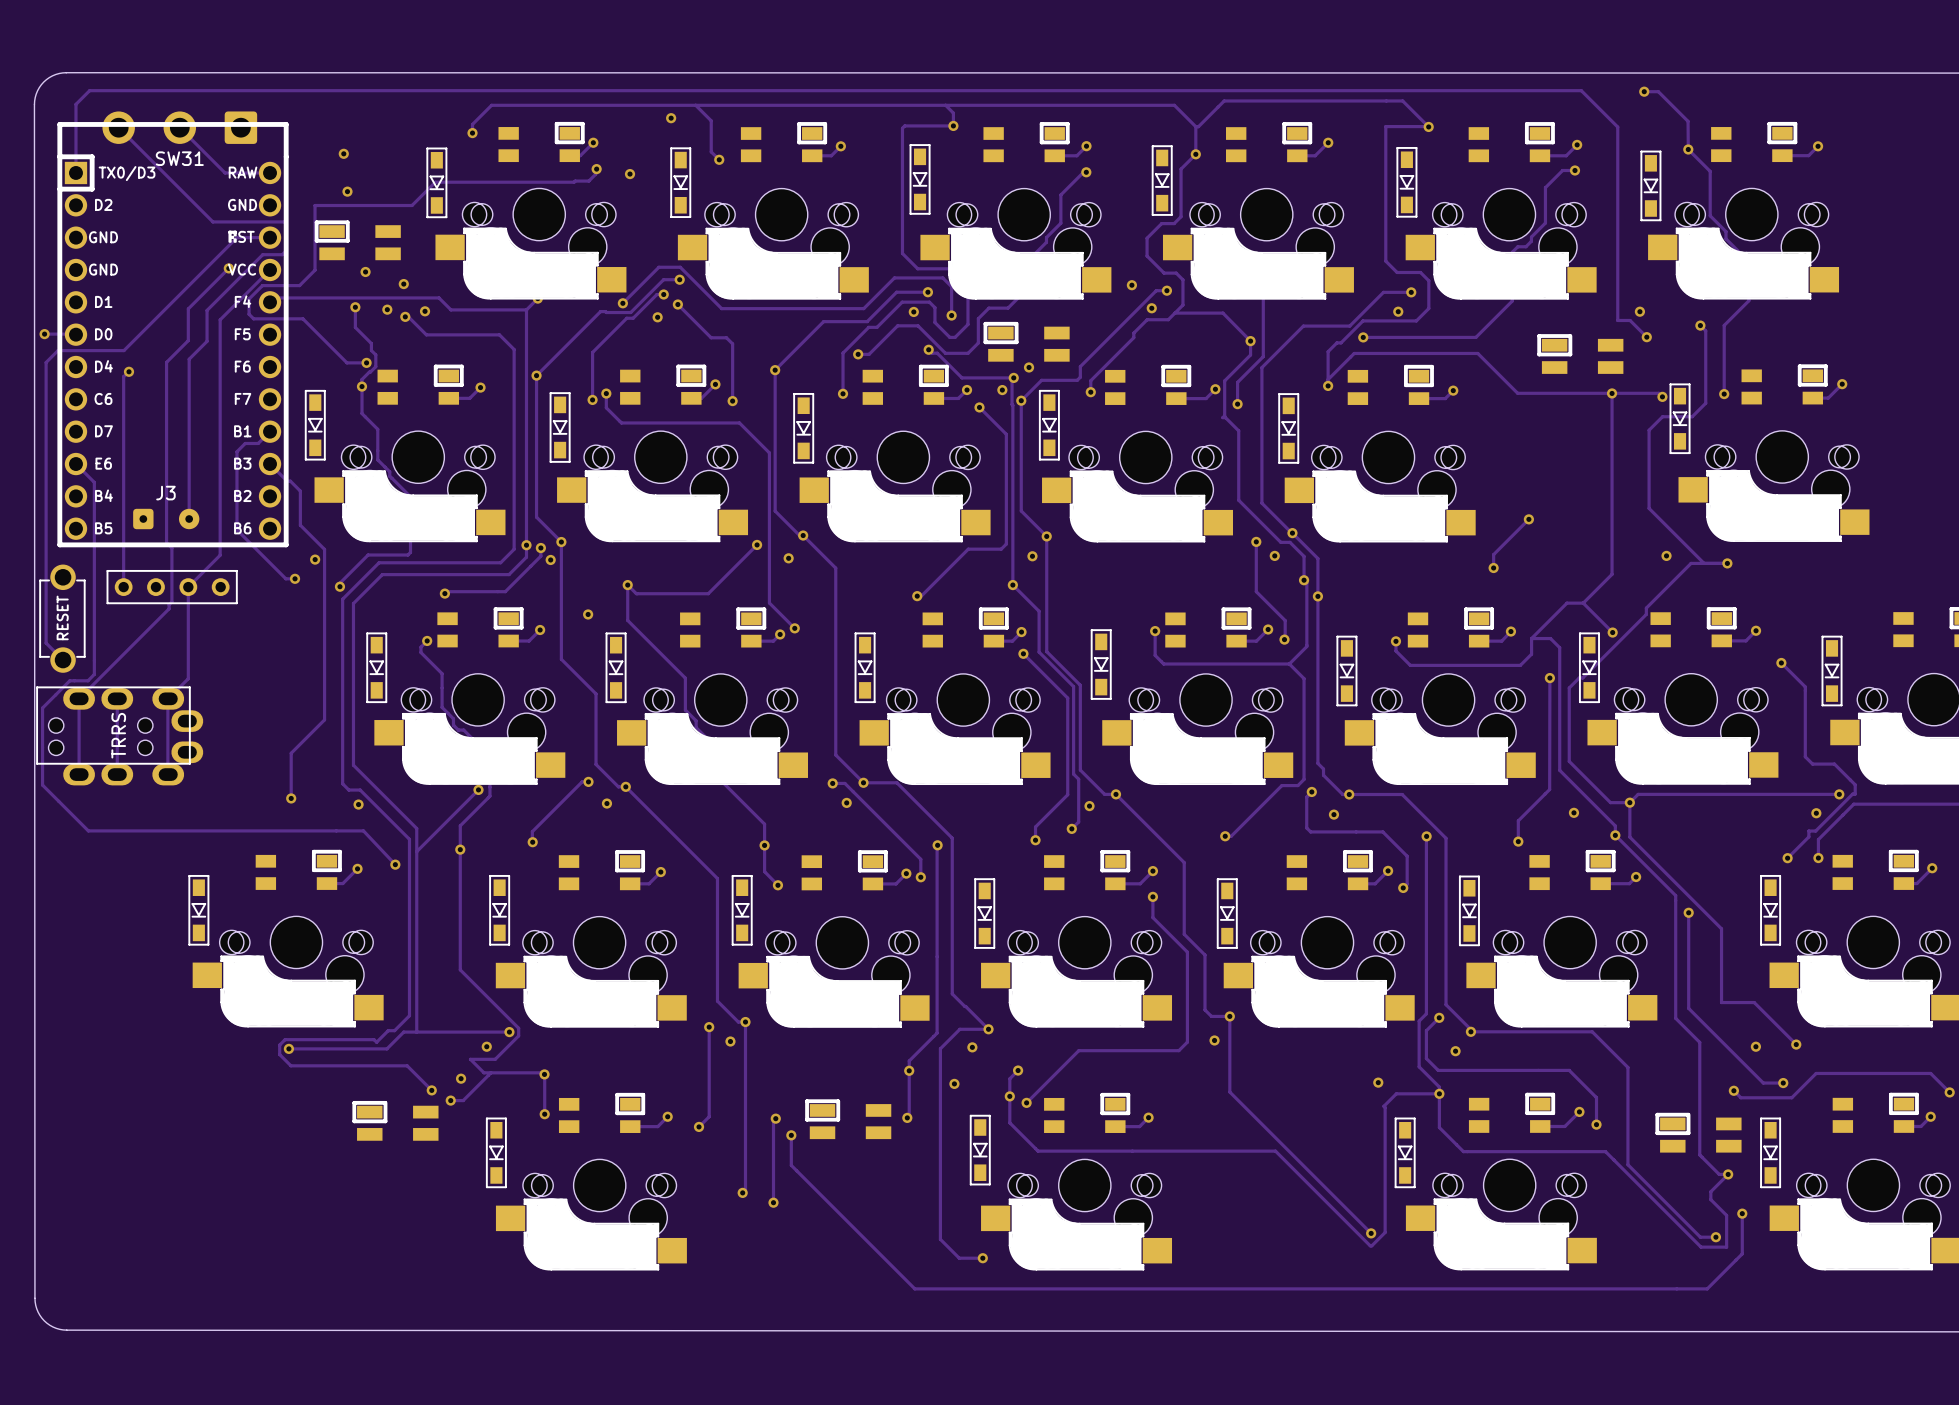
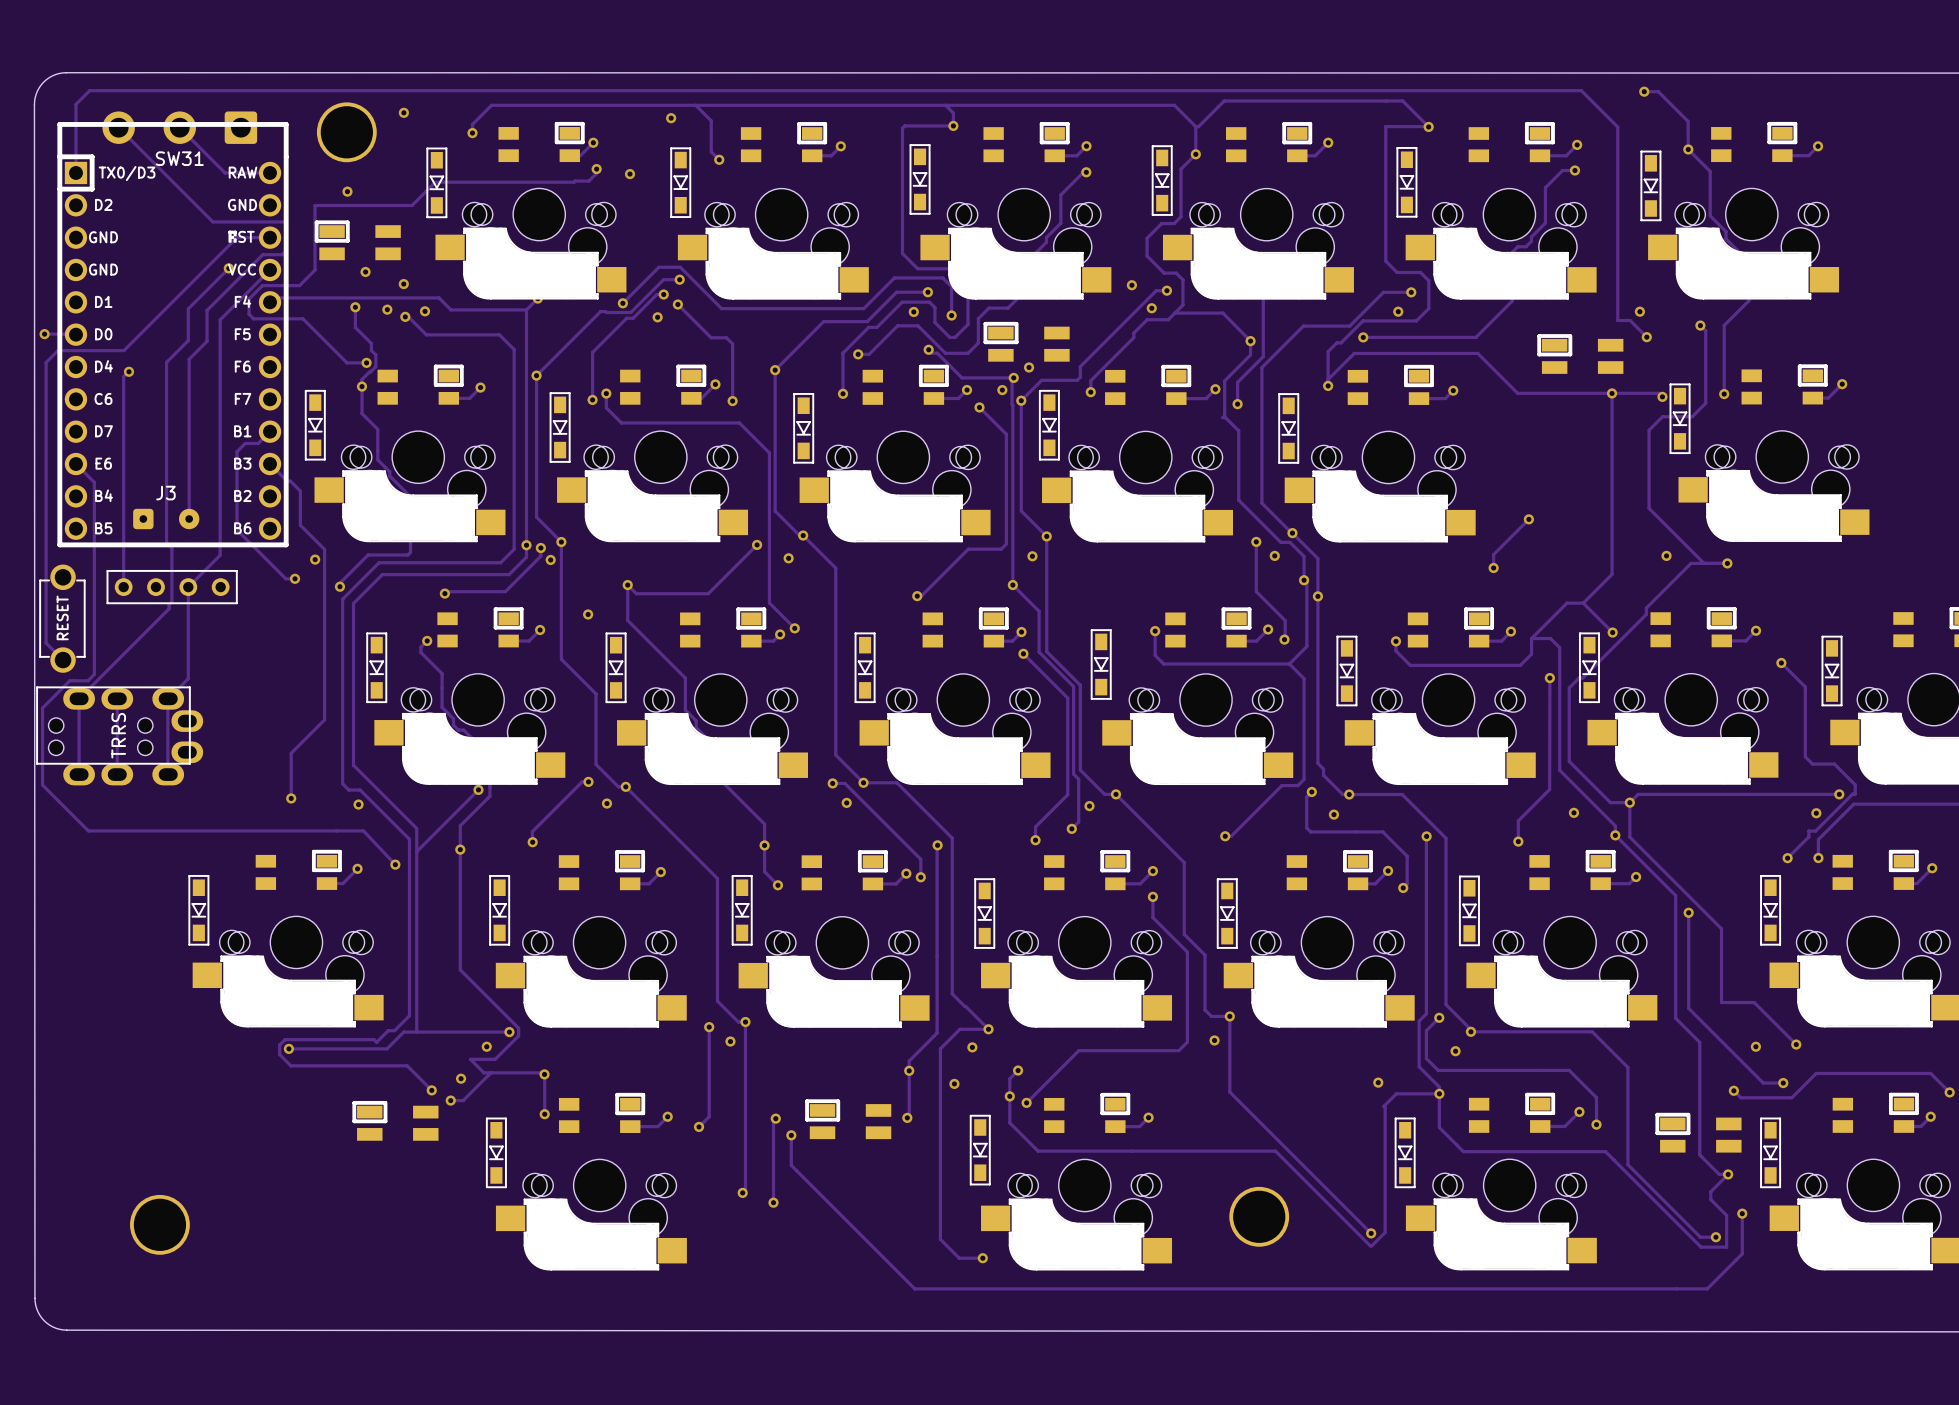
part: none -> (346, 132)
via position: (343, 153) -> (403, 112)
part: none -> (1259, 1216)
part: none -> (159, 1224)

